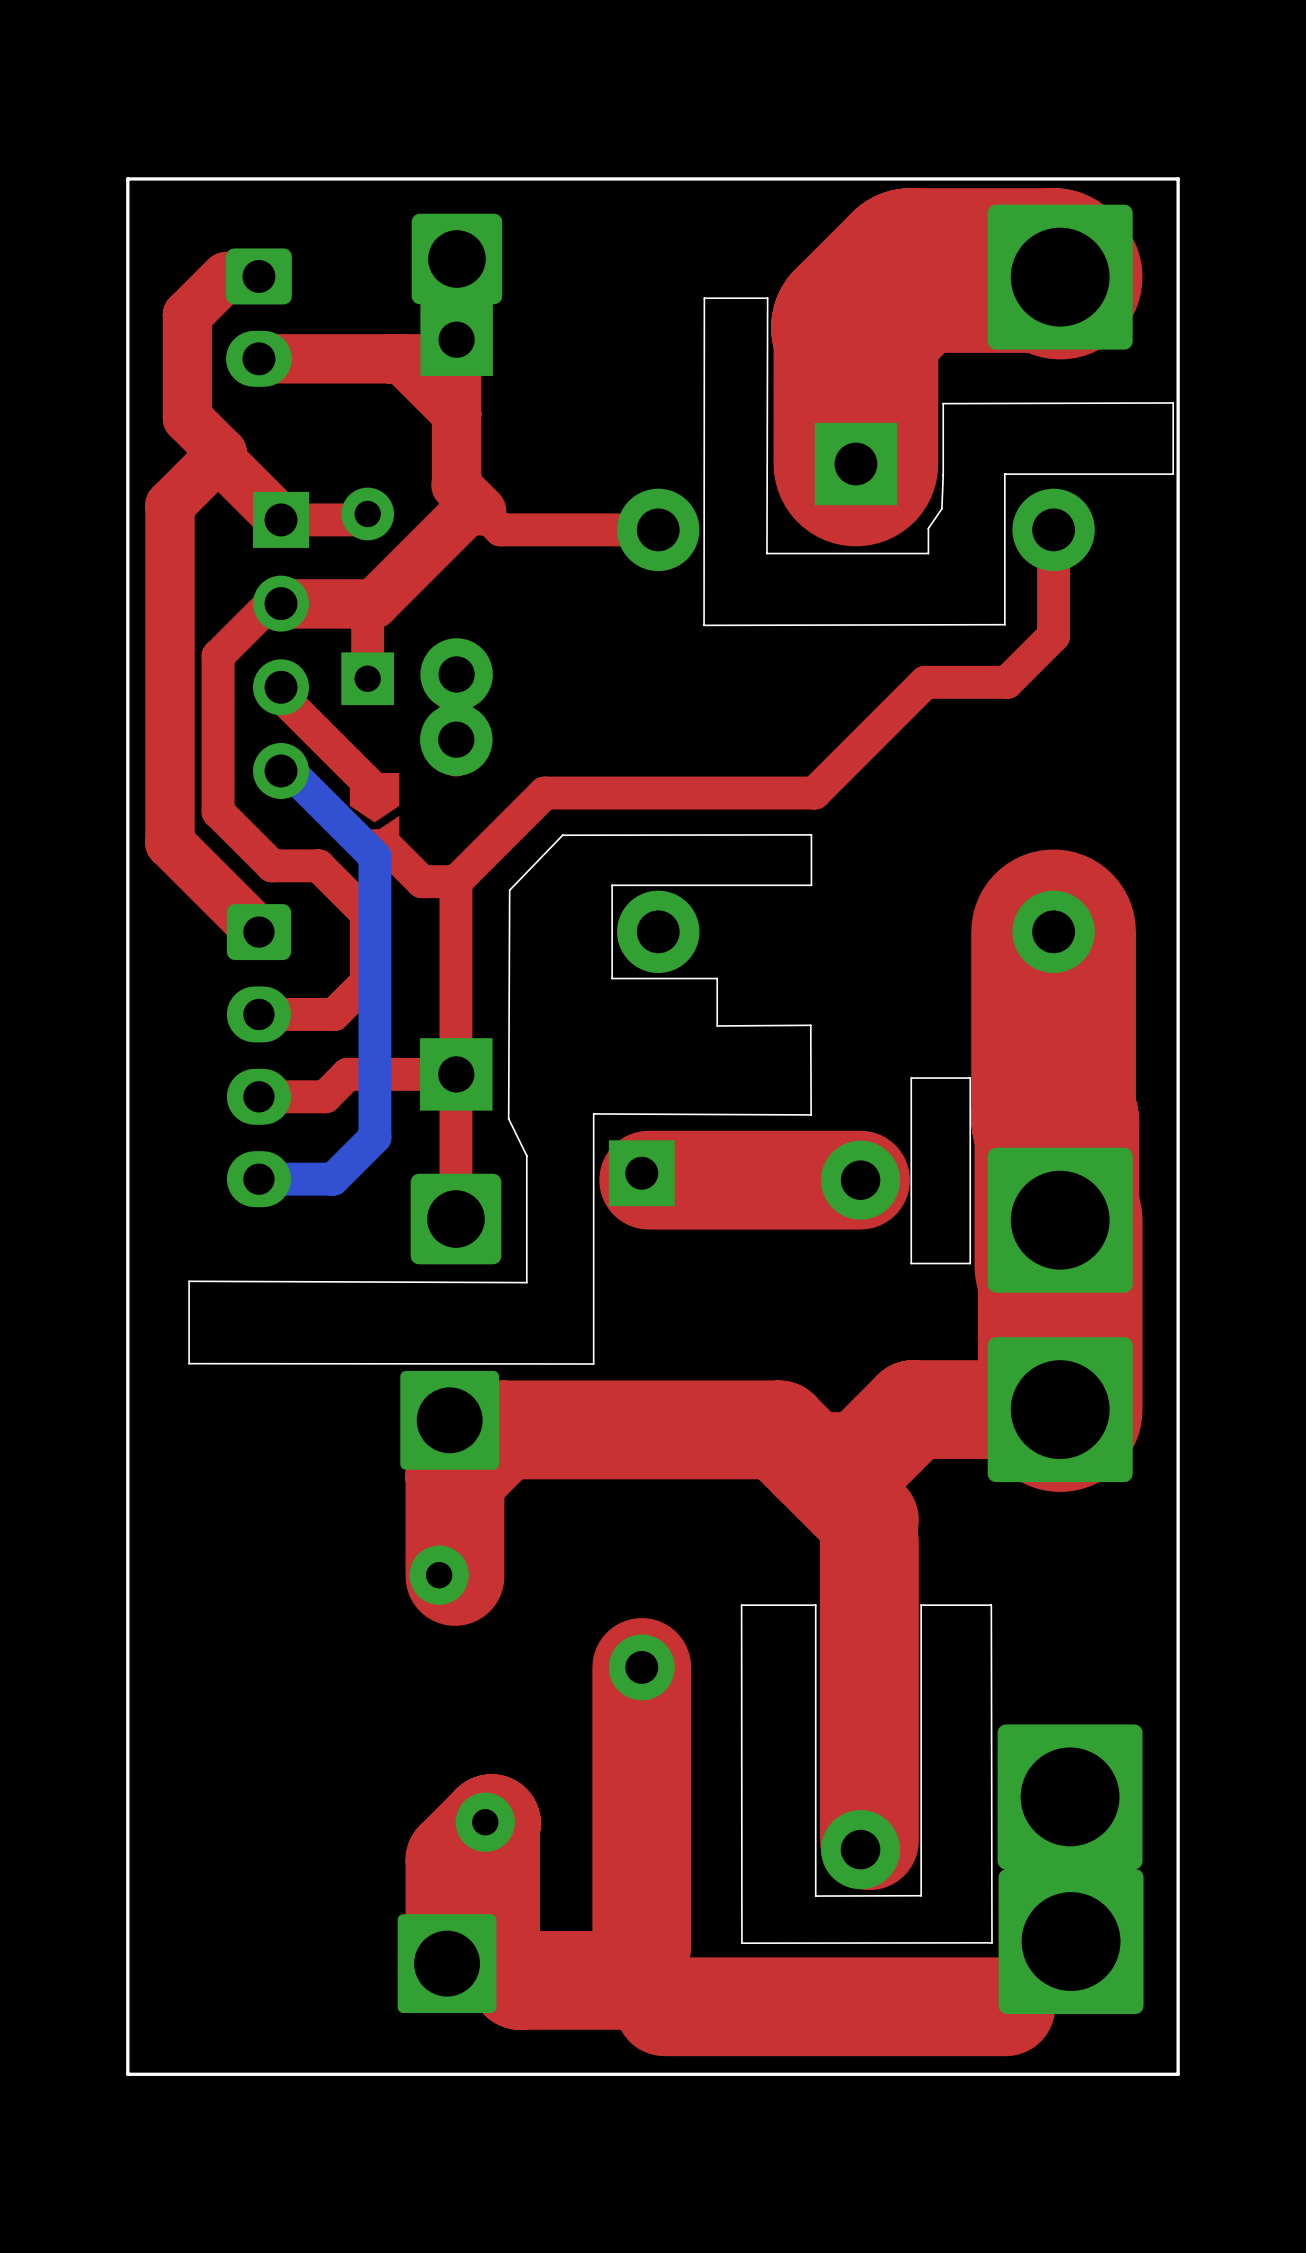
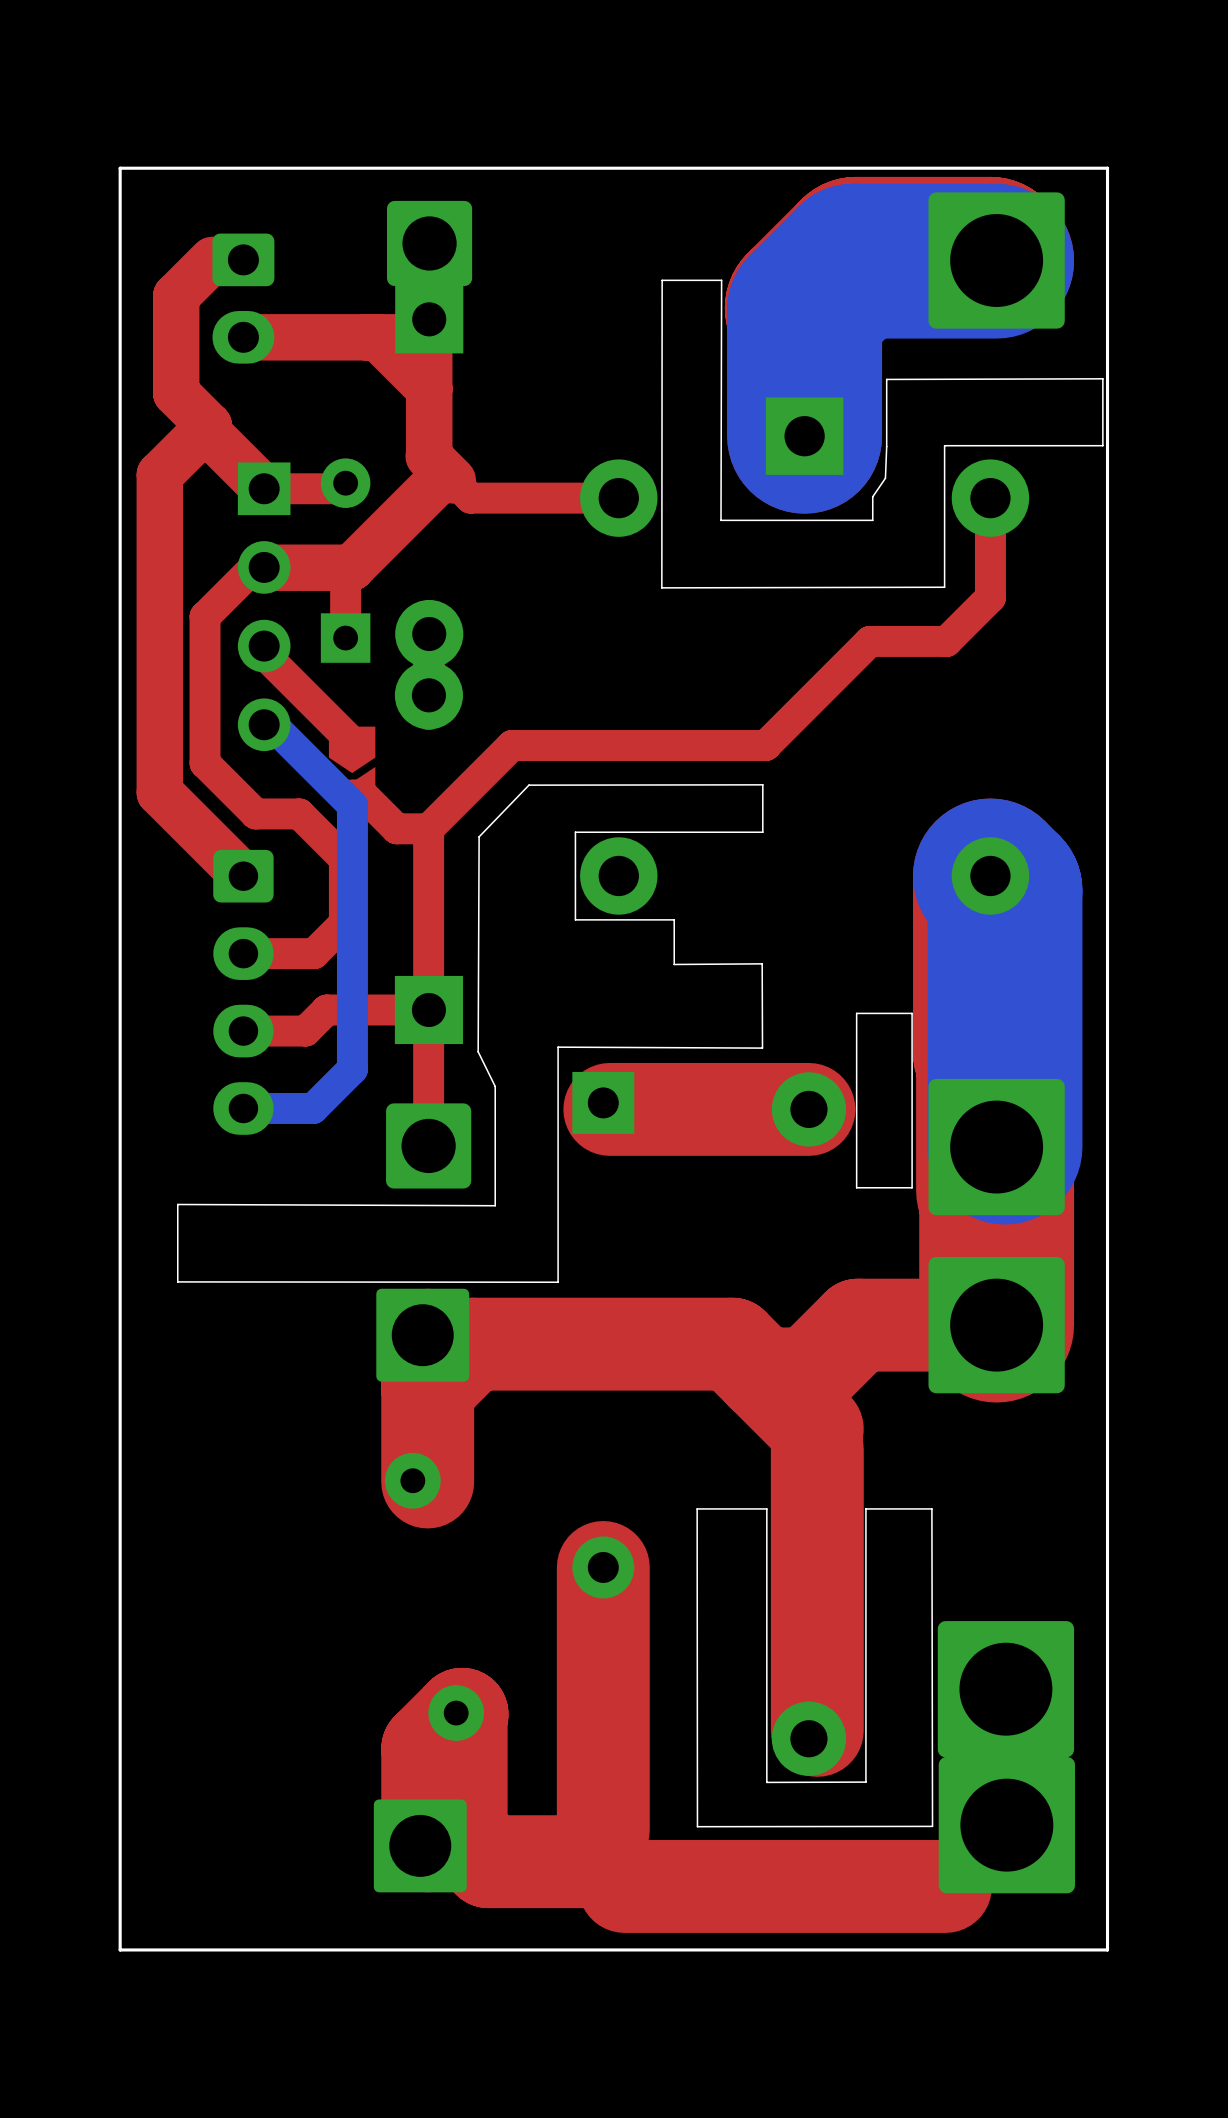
bottom track: none -> (996, 261) (853, 261) (804, 310) (804, 436)
bottom track: none -> (990, 875) (1005, 890) (1005, 1147)

